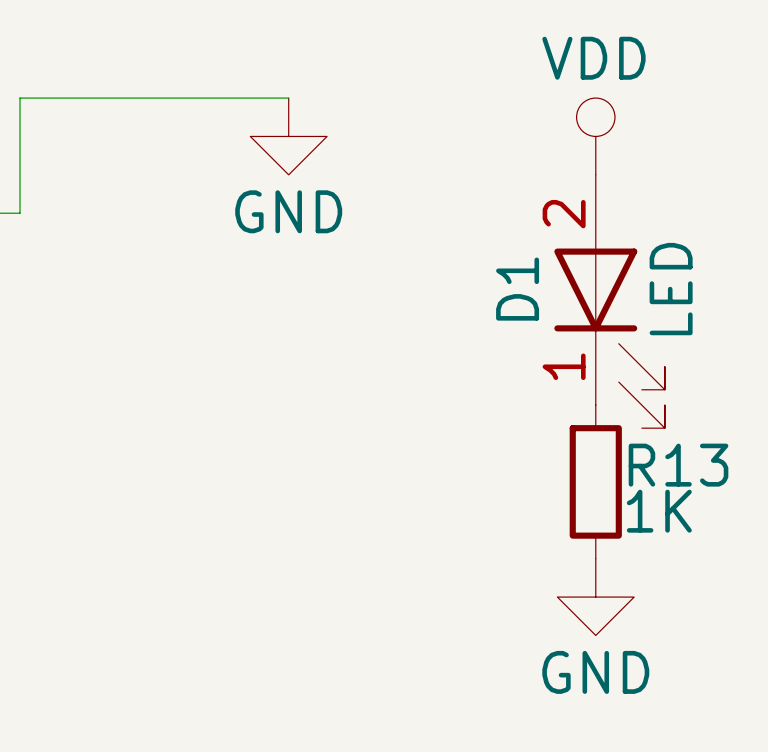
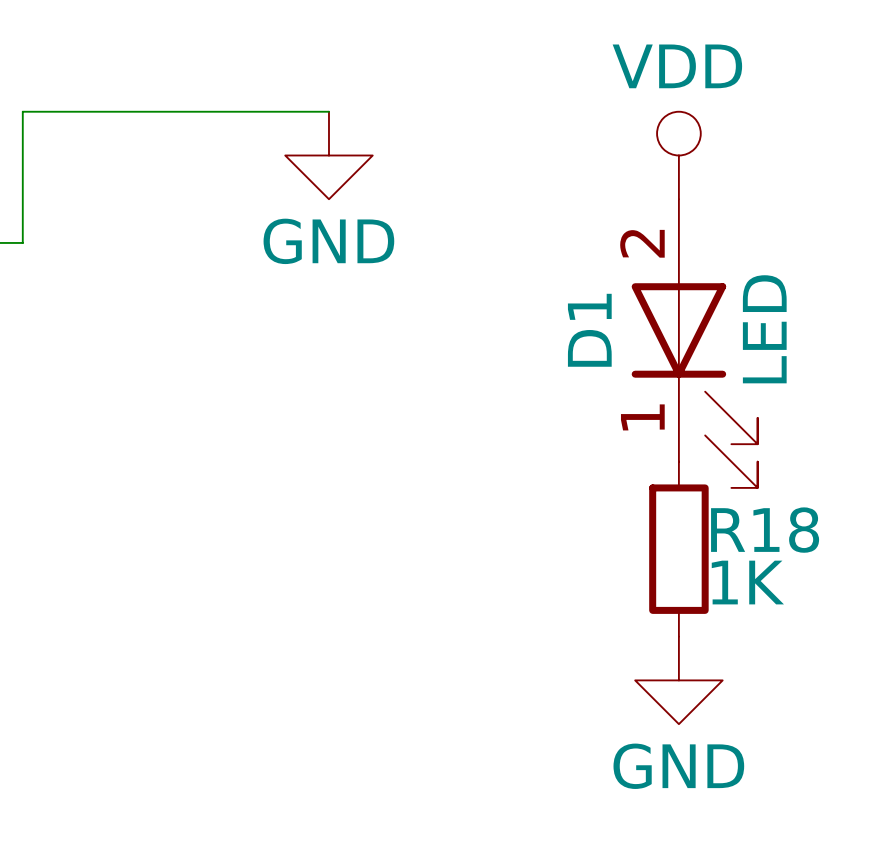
R13 name: R13 (678, 465) -> R18 (765, 530)

